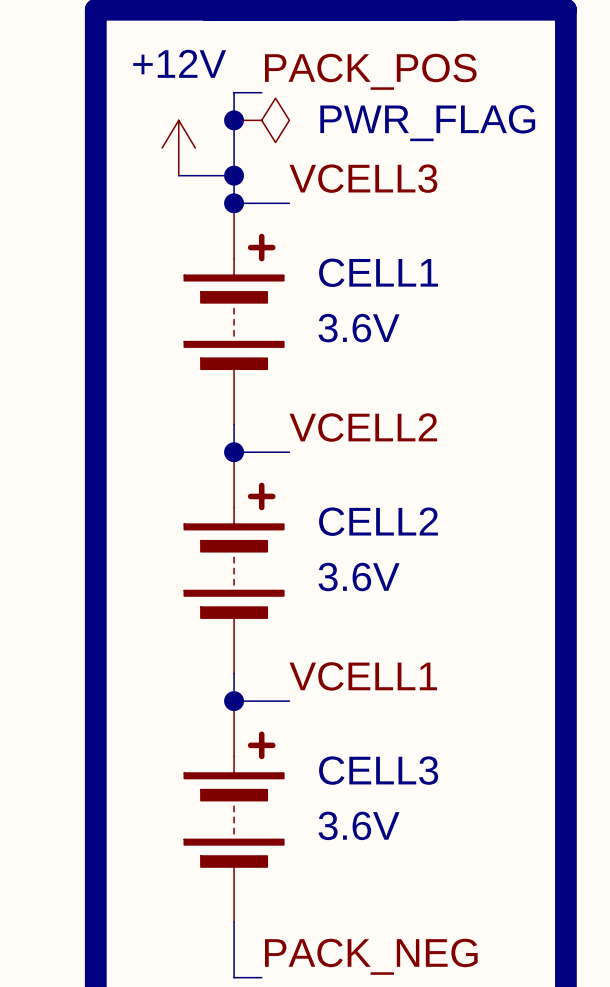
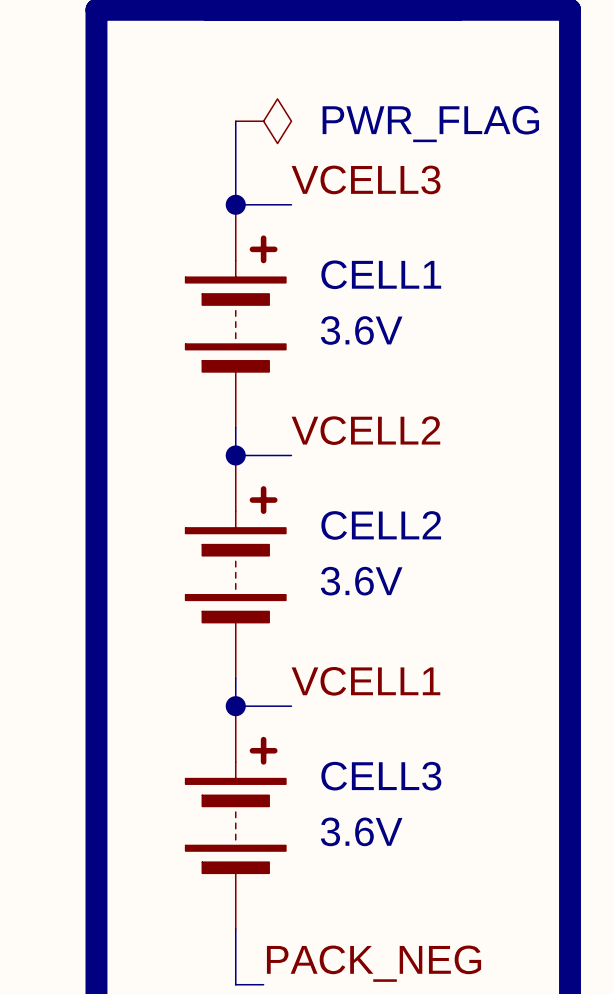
label: PACK_POS (370, 71) -> none
wire: (261, 92) (234, 92) (234, 120) -> none
junction: (234, 120) -> none
power symbol: +12V (178, 148) -> none
wire: (178, 175) (234, 175) -> none
junction: (234, 175) -> none

